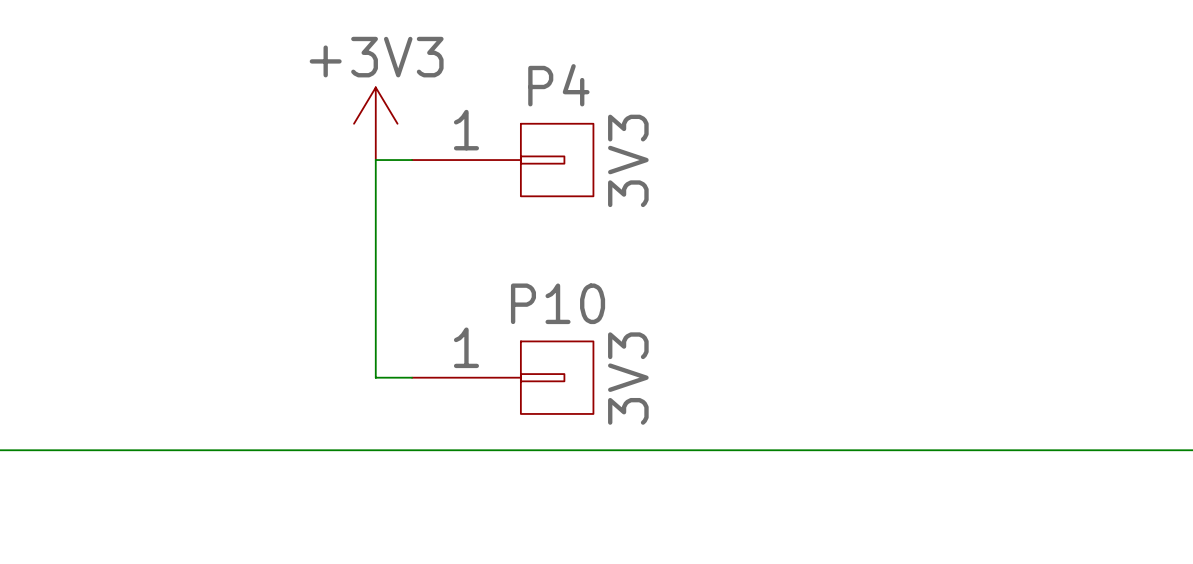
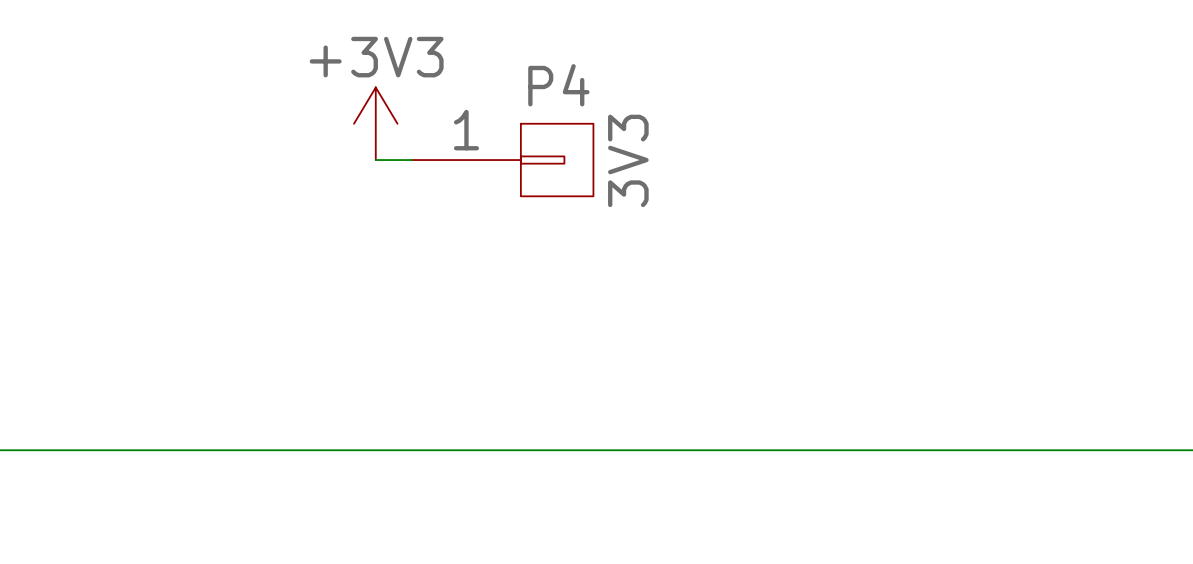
wire: (375, 160) (375, 377) (412, 377) -> none
P10: 3V3 (502, 377) -> none

